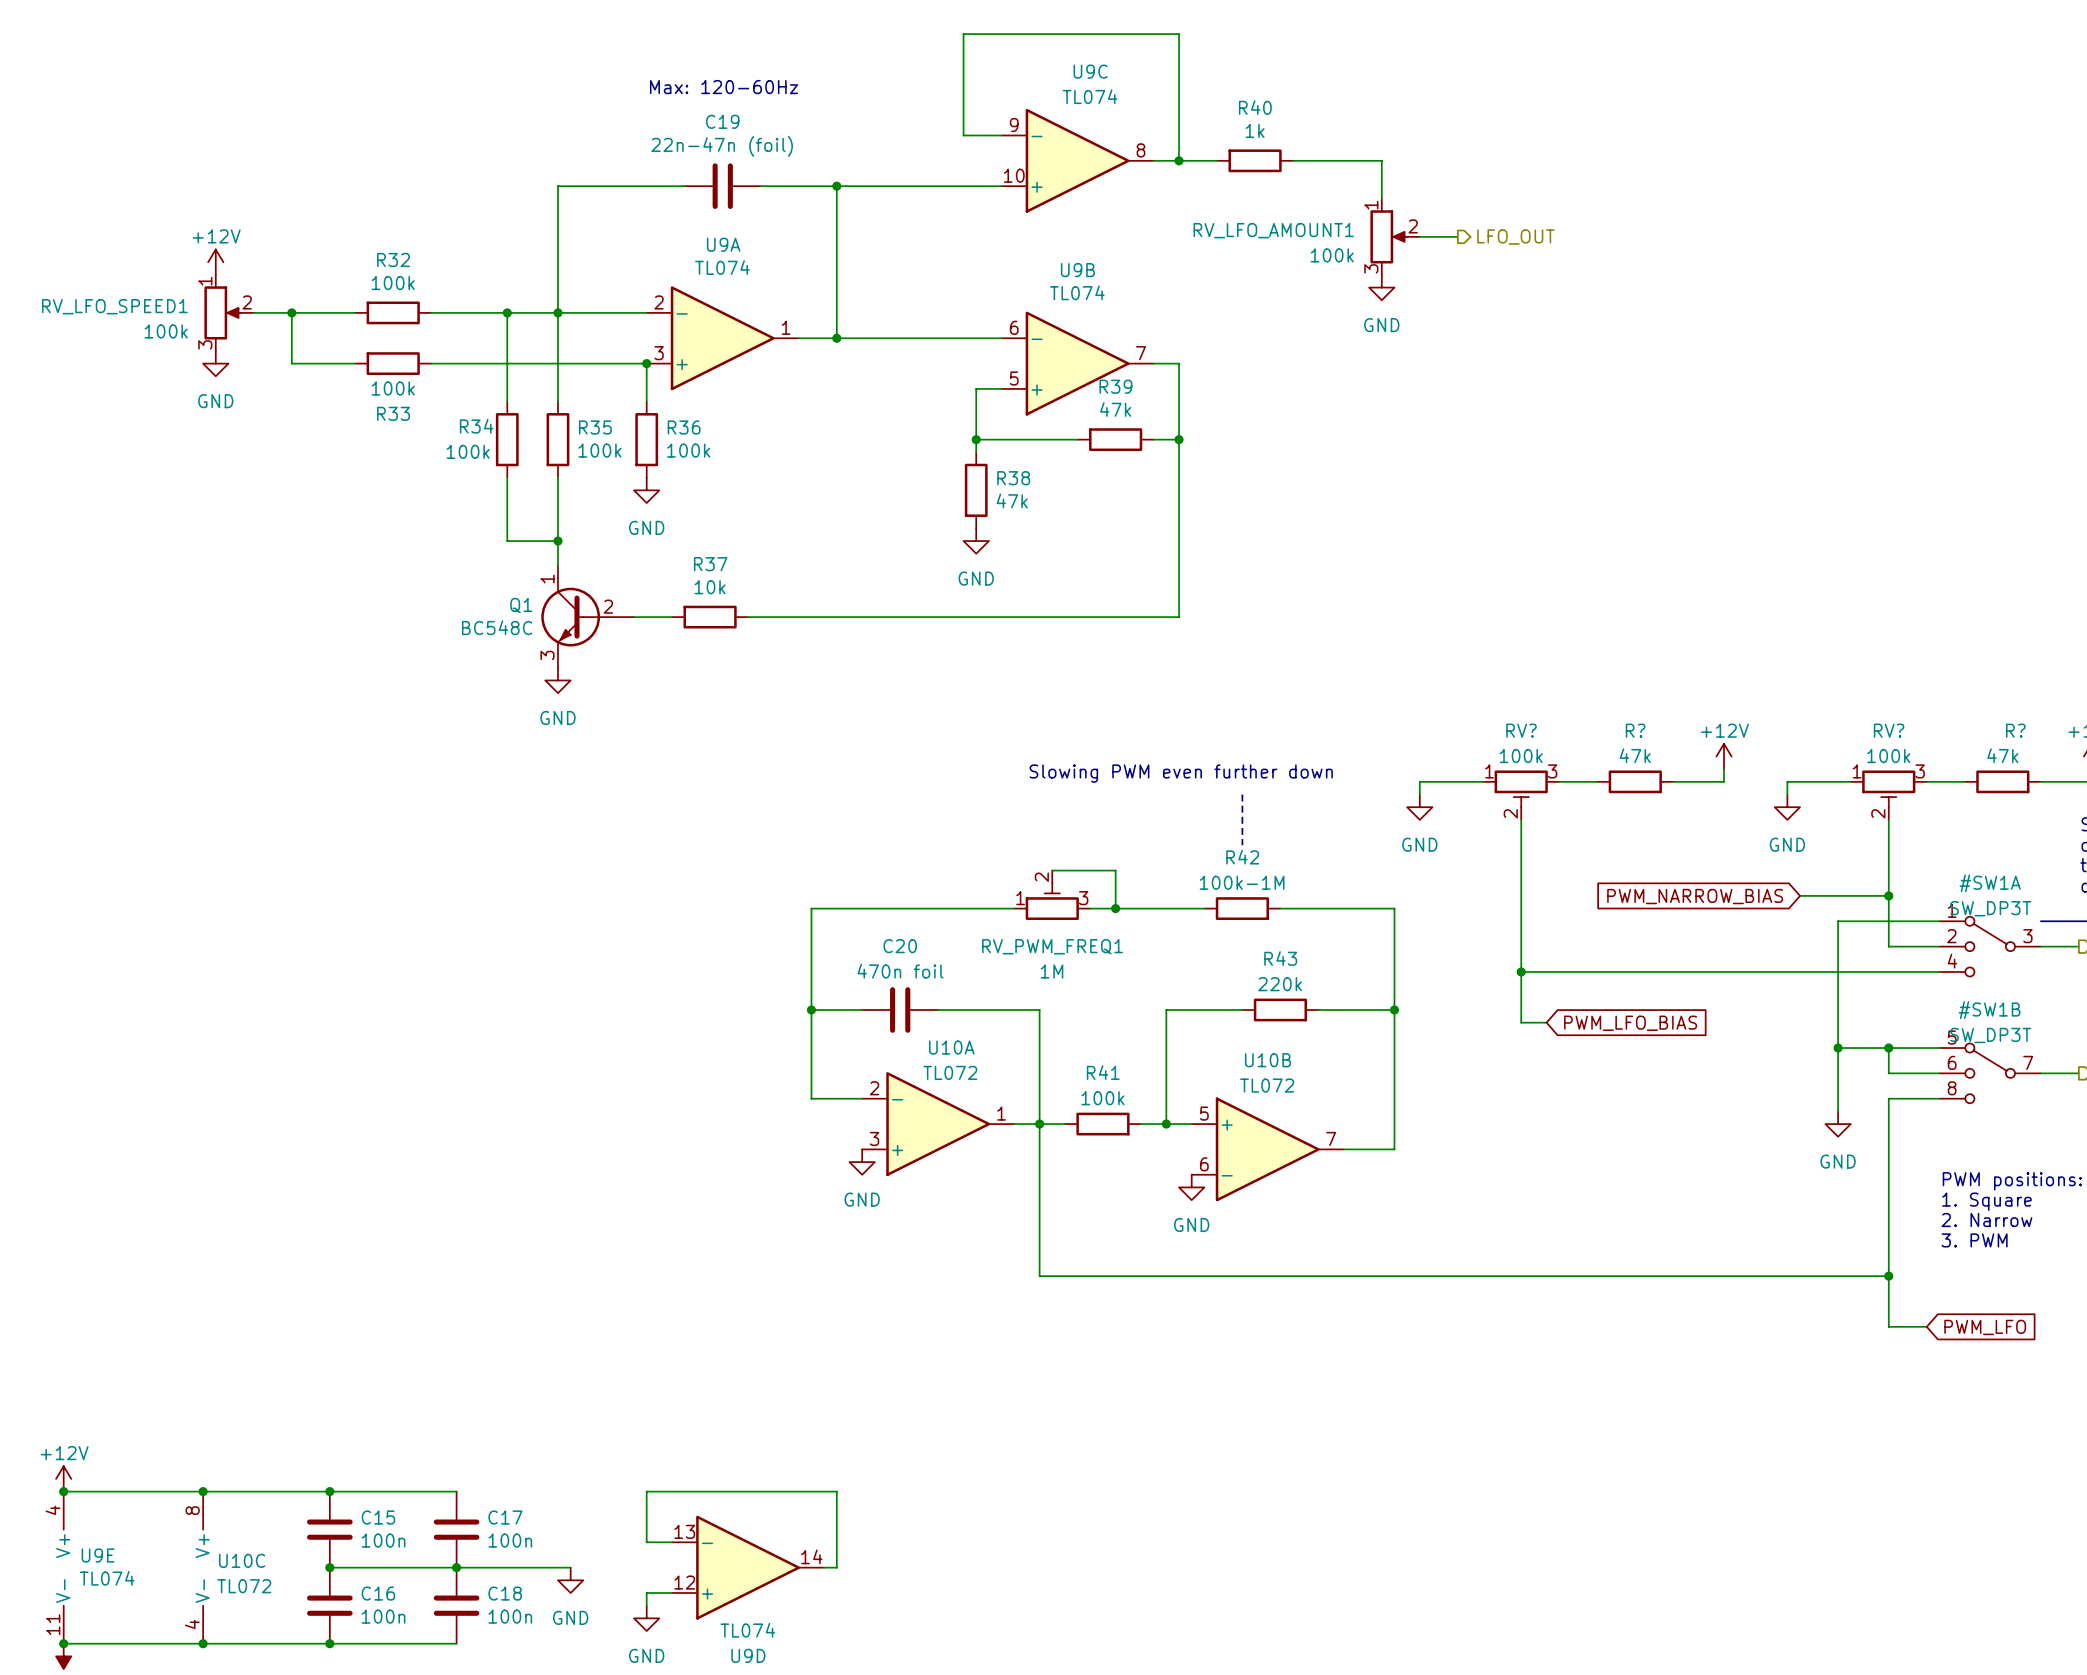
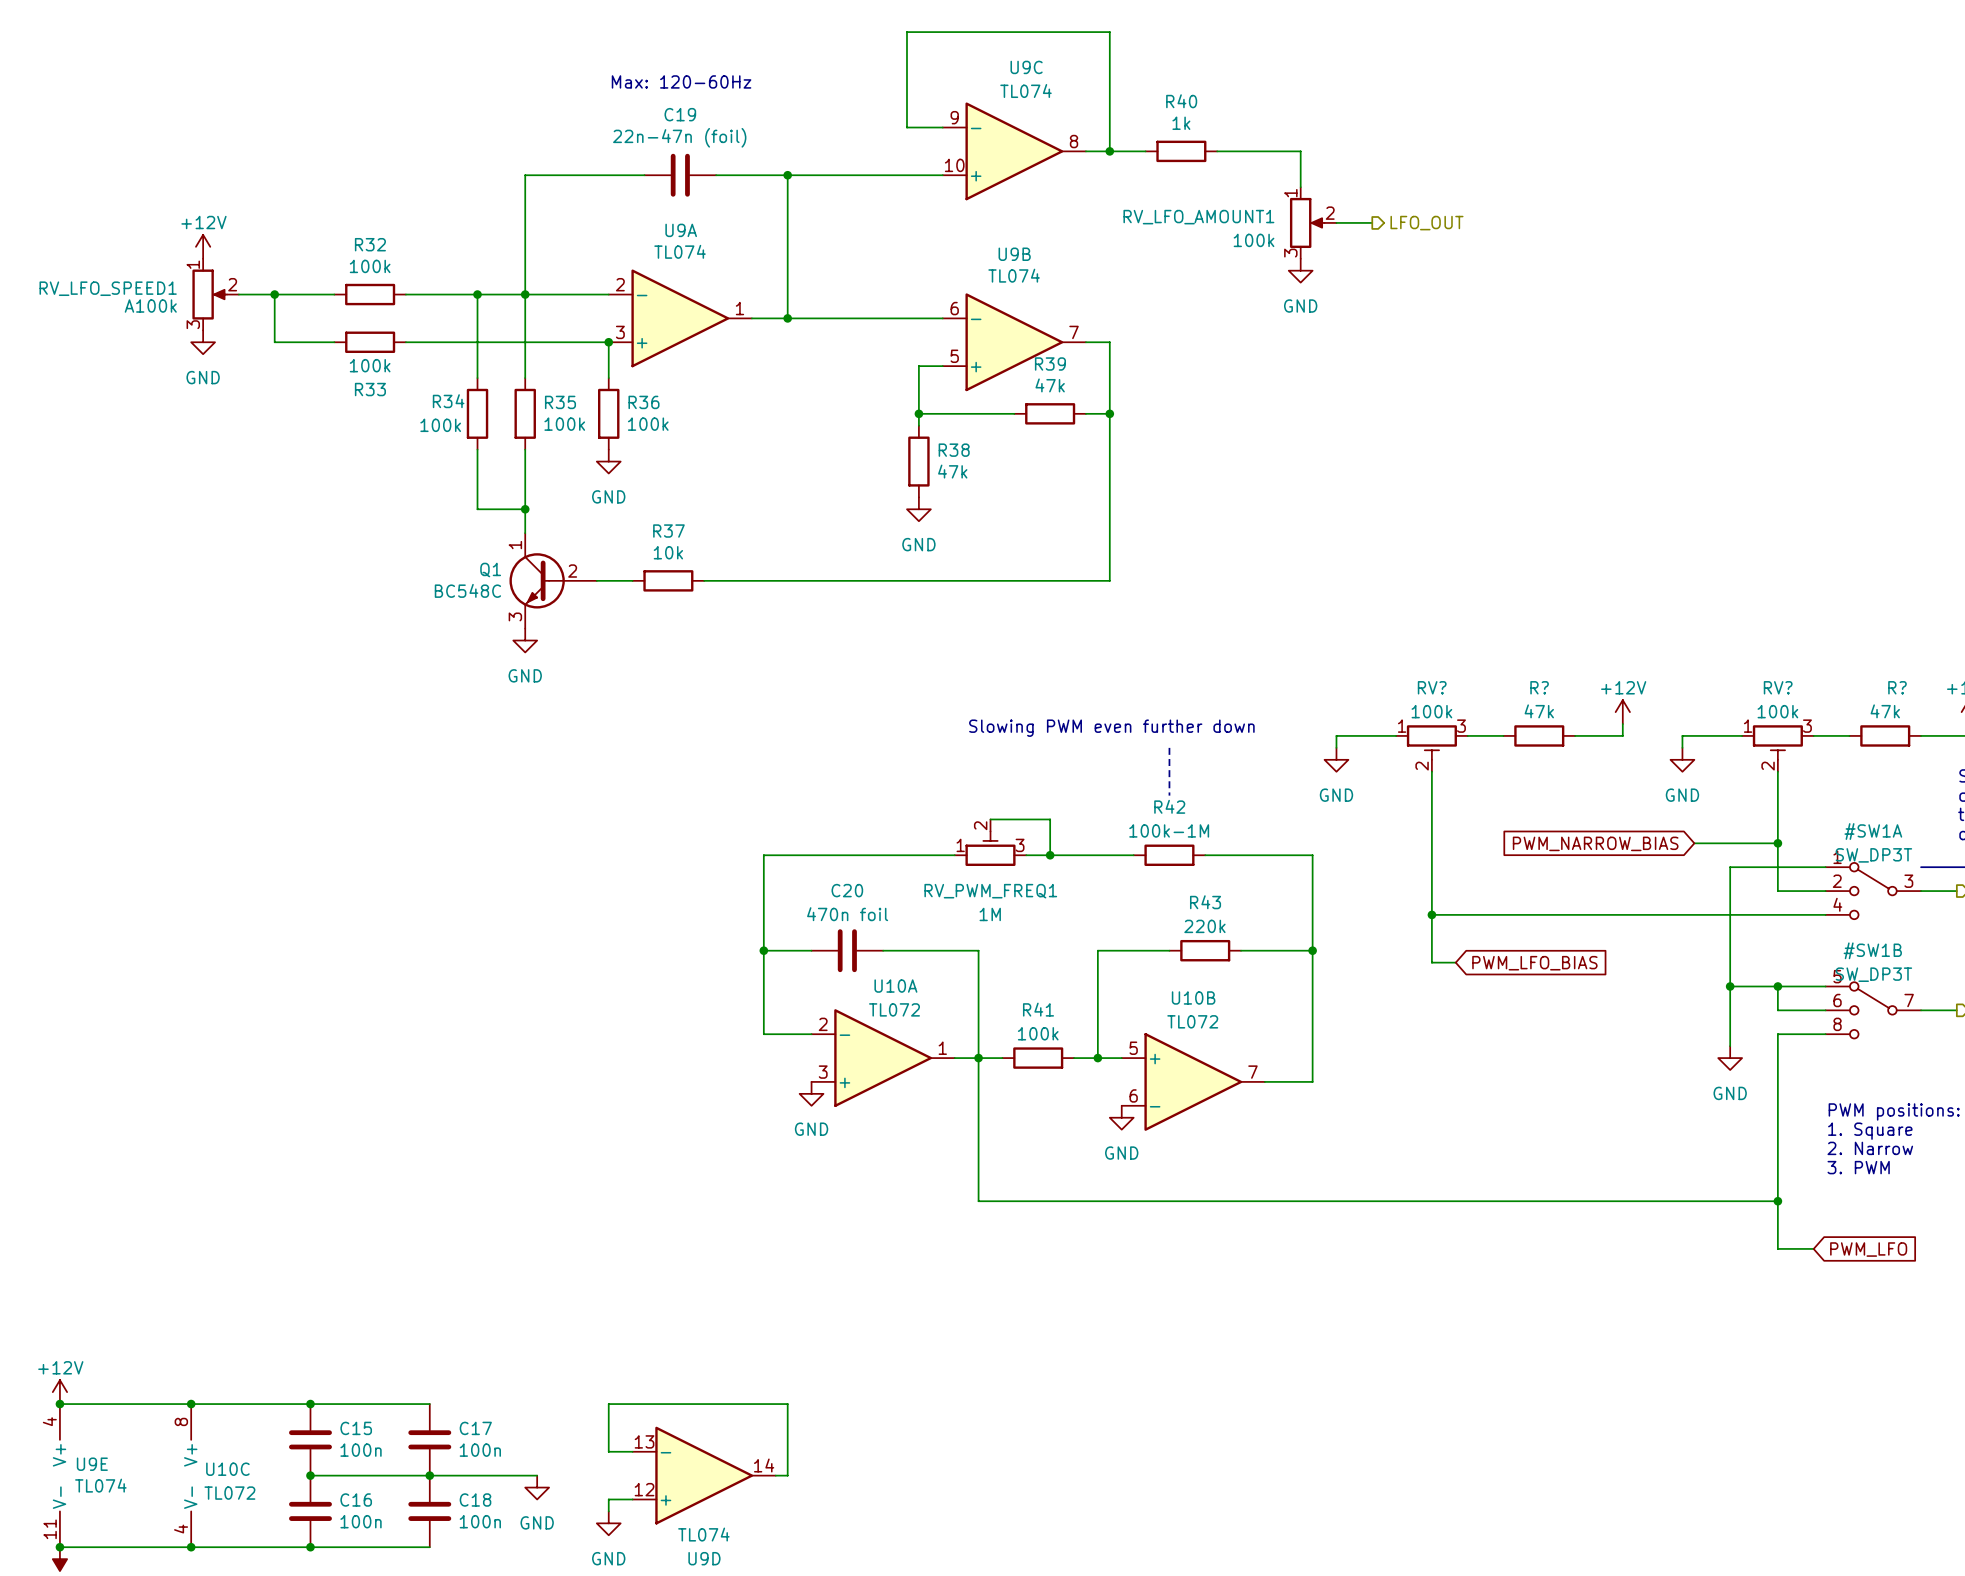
RV_LFO_SPEED1 value: 100k (166, 331) -> A100k (150, 306)

